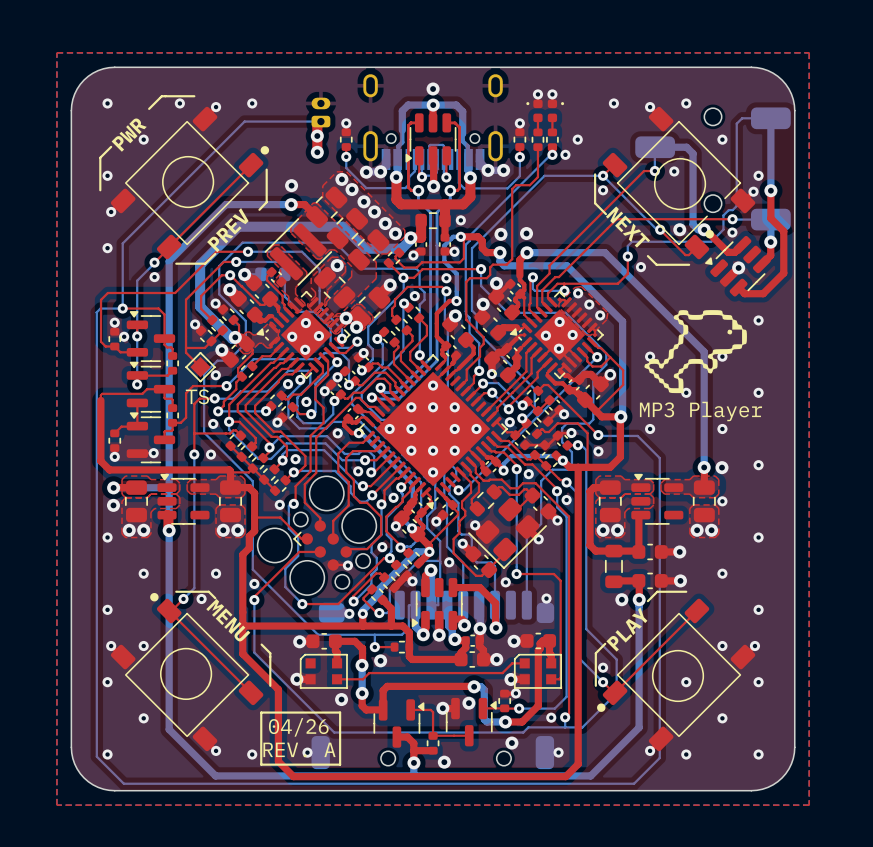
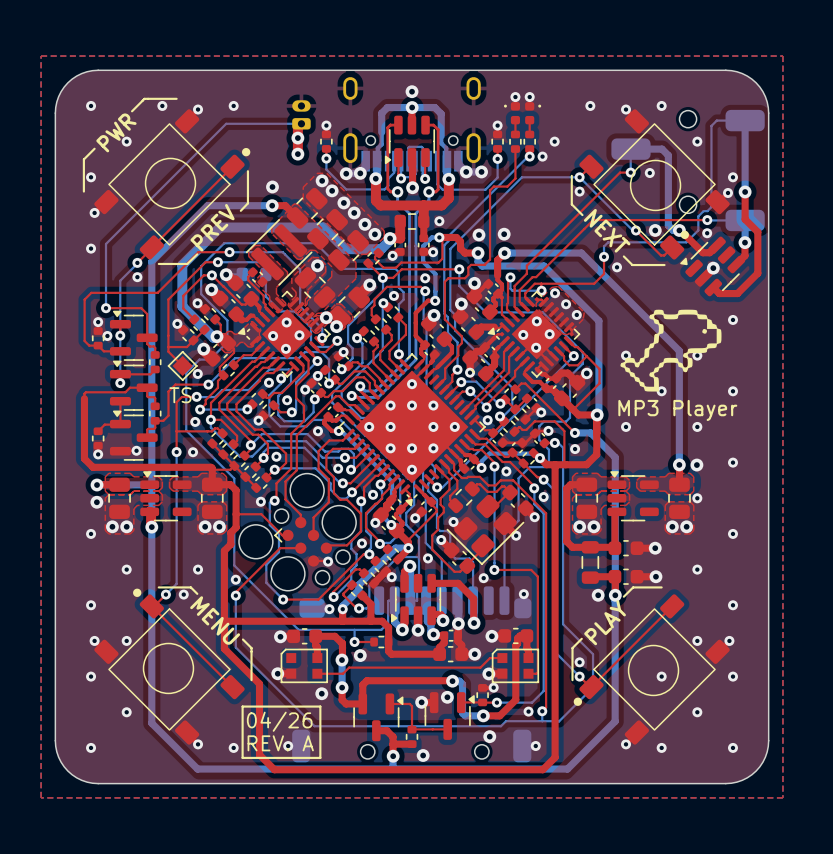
part footprint: [602, 106, 756, 260] -> [579, 109, 730, 260]
bottom track: (122, 308) (100, 308) (96, 312) -> none
bottom track: (96, 312) (96, 756) (123, 783) (634, 783) (659, 757) (659, 458) (637, 435) (598, 435) -> (615, 595) (615, 457) (590, 432) (574, 432)

